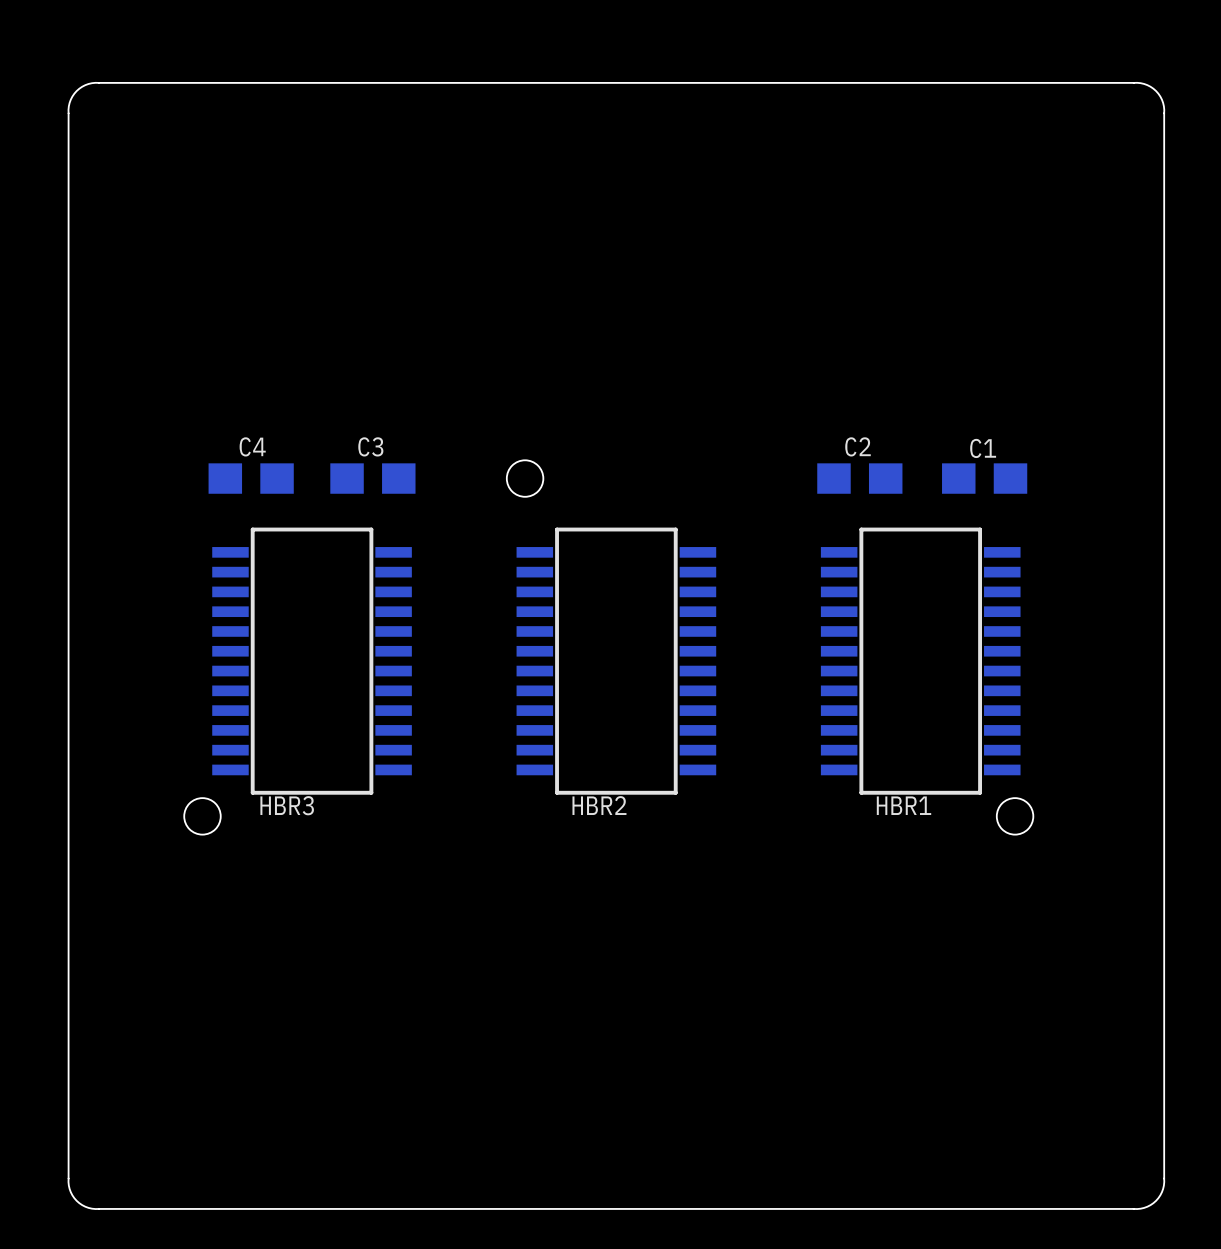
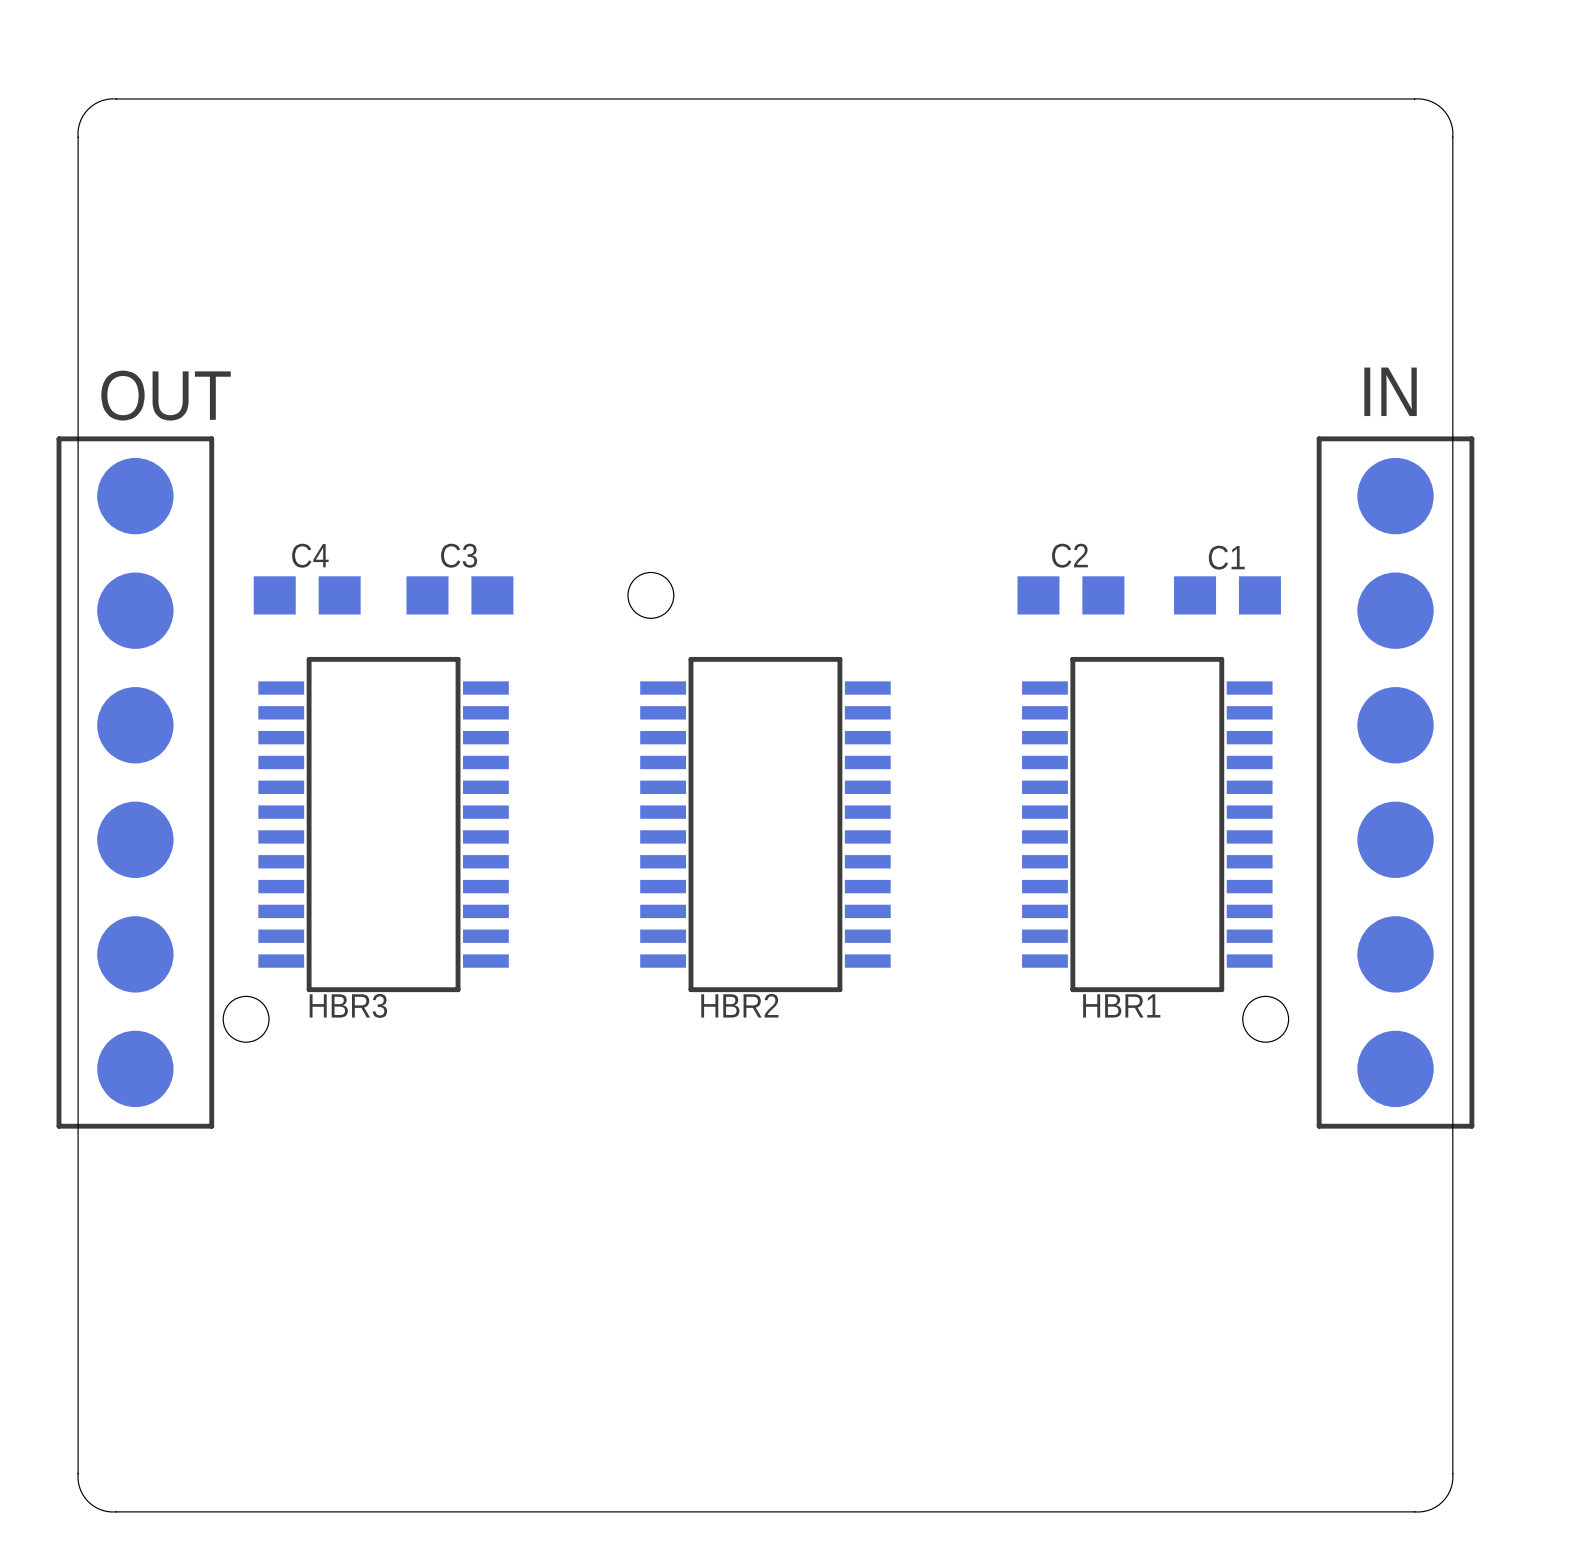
OUT: none -> (135, 782)
IN: none -> (1395, 782)

